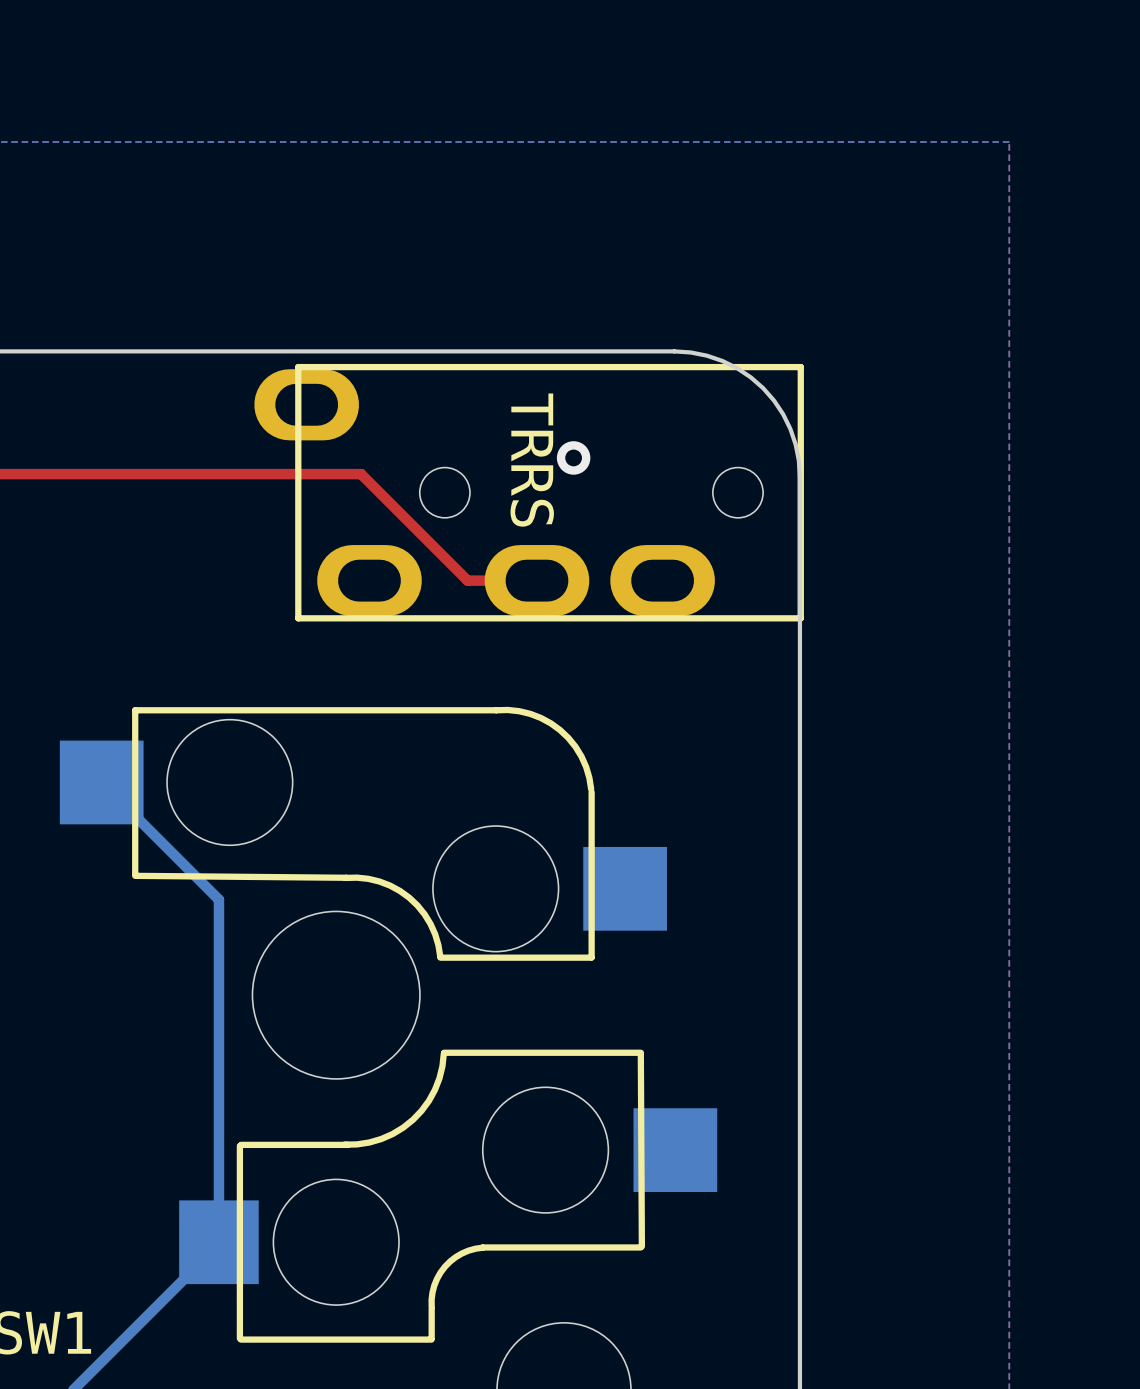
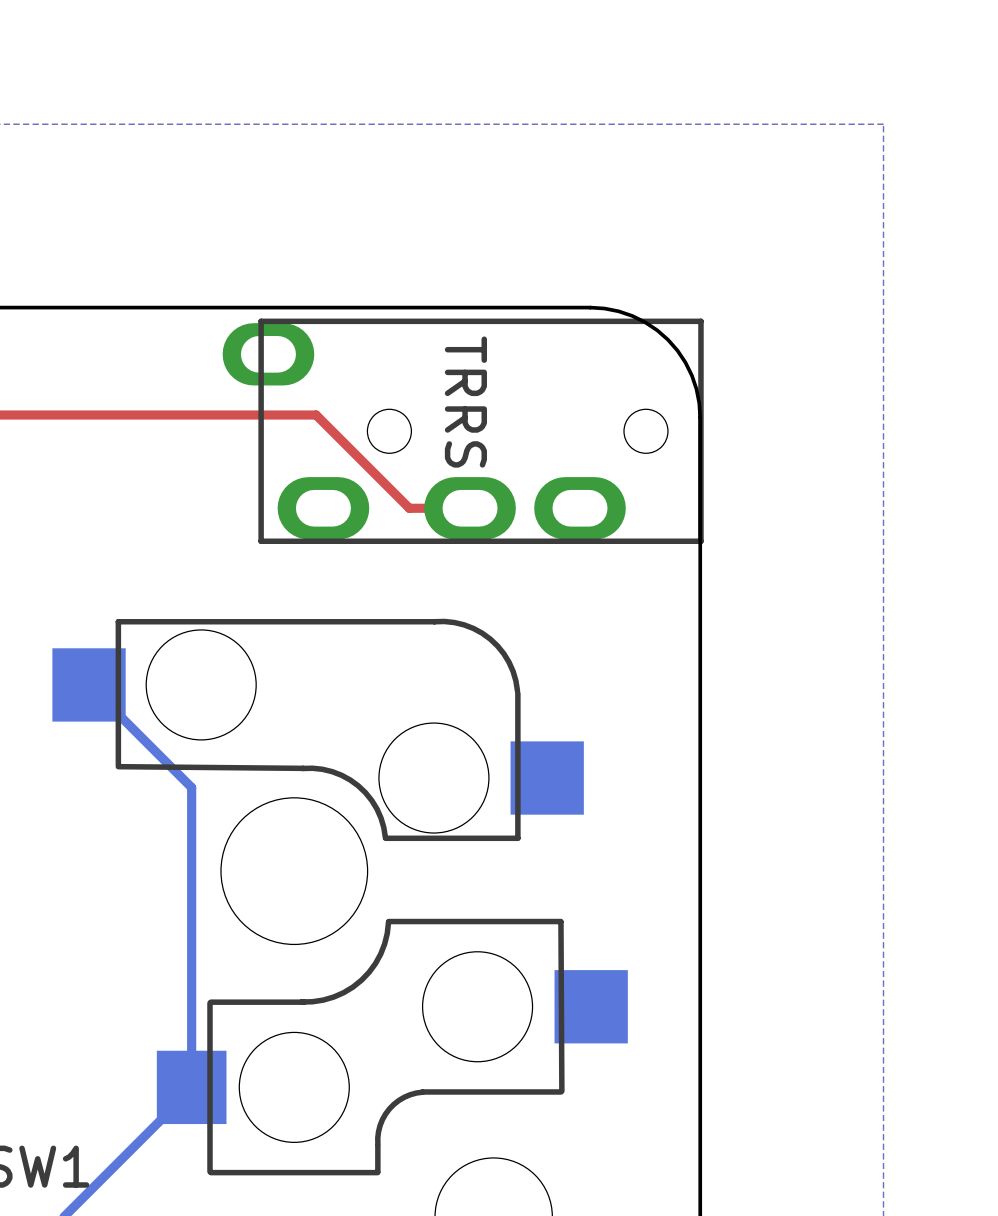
via: (573, 457) -> none

